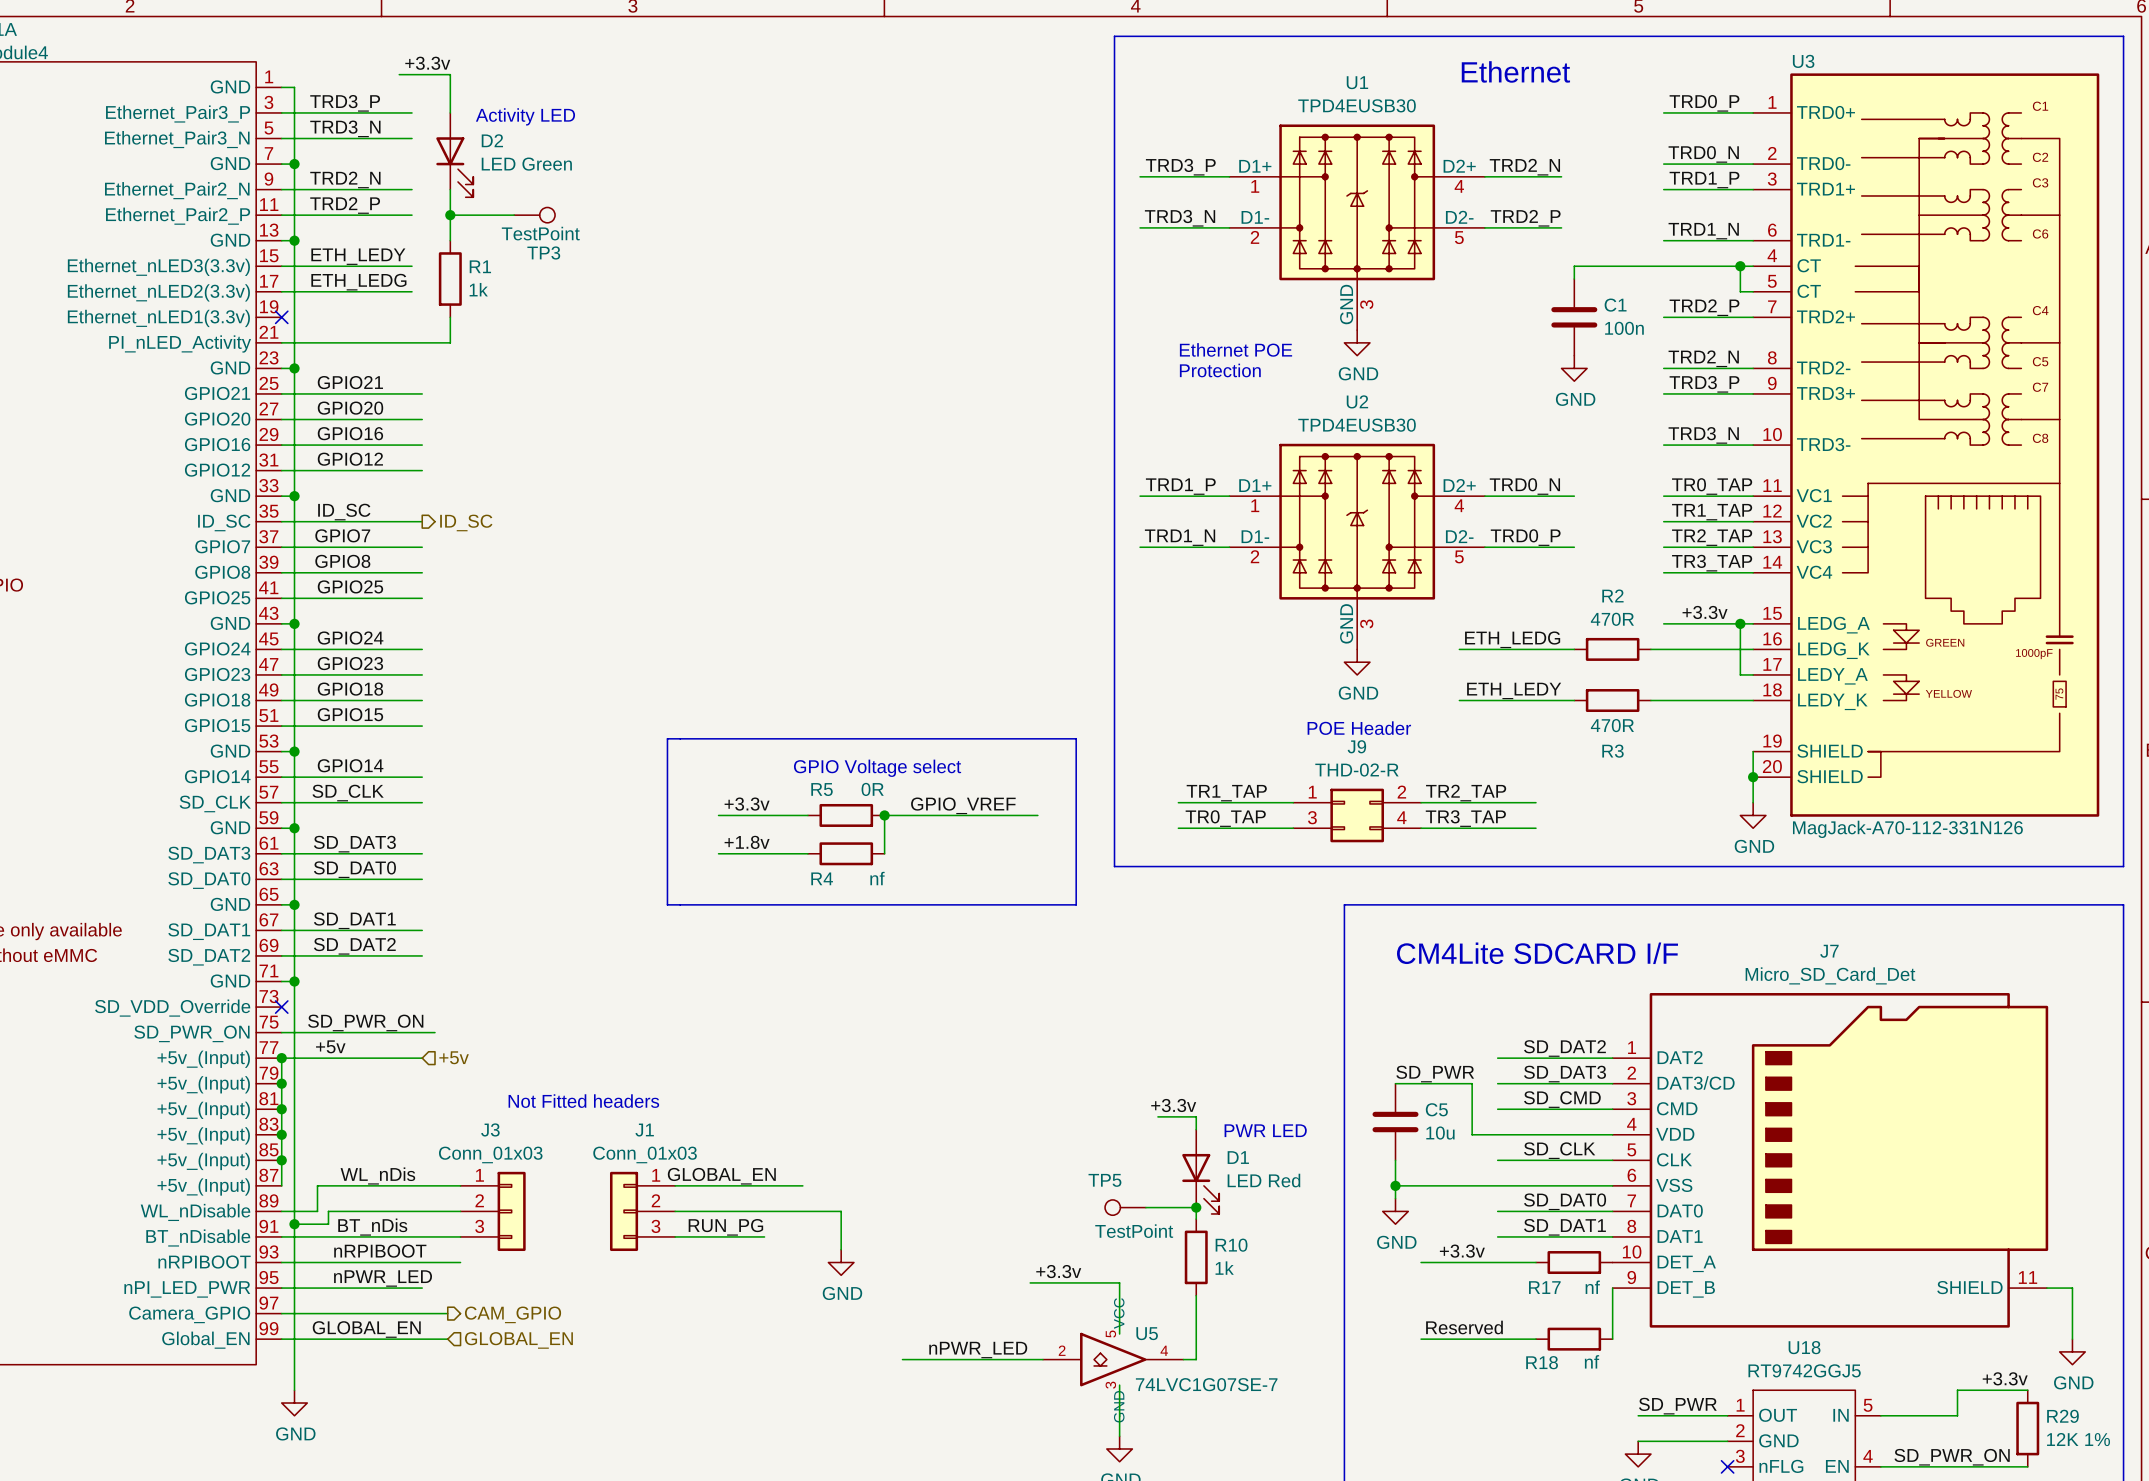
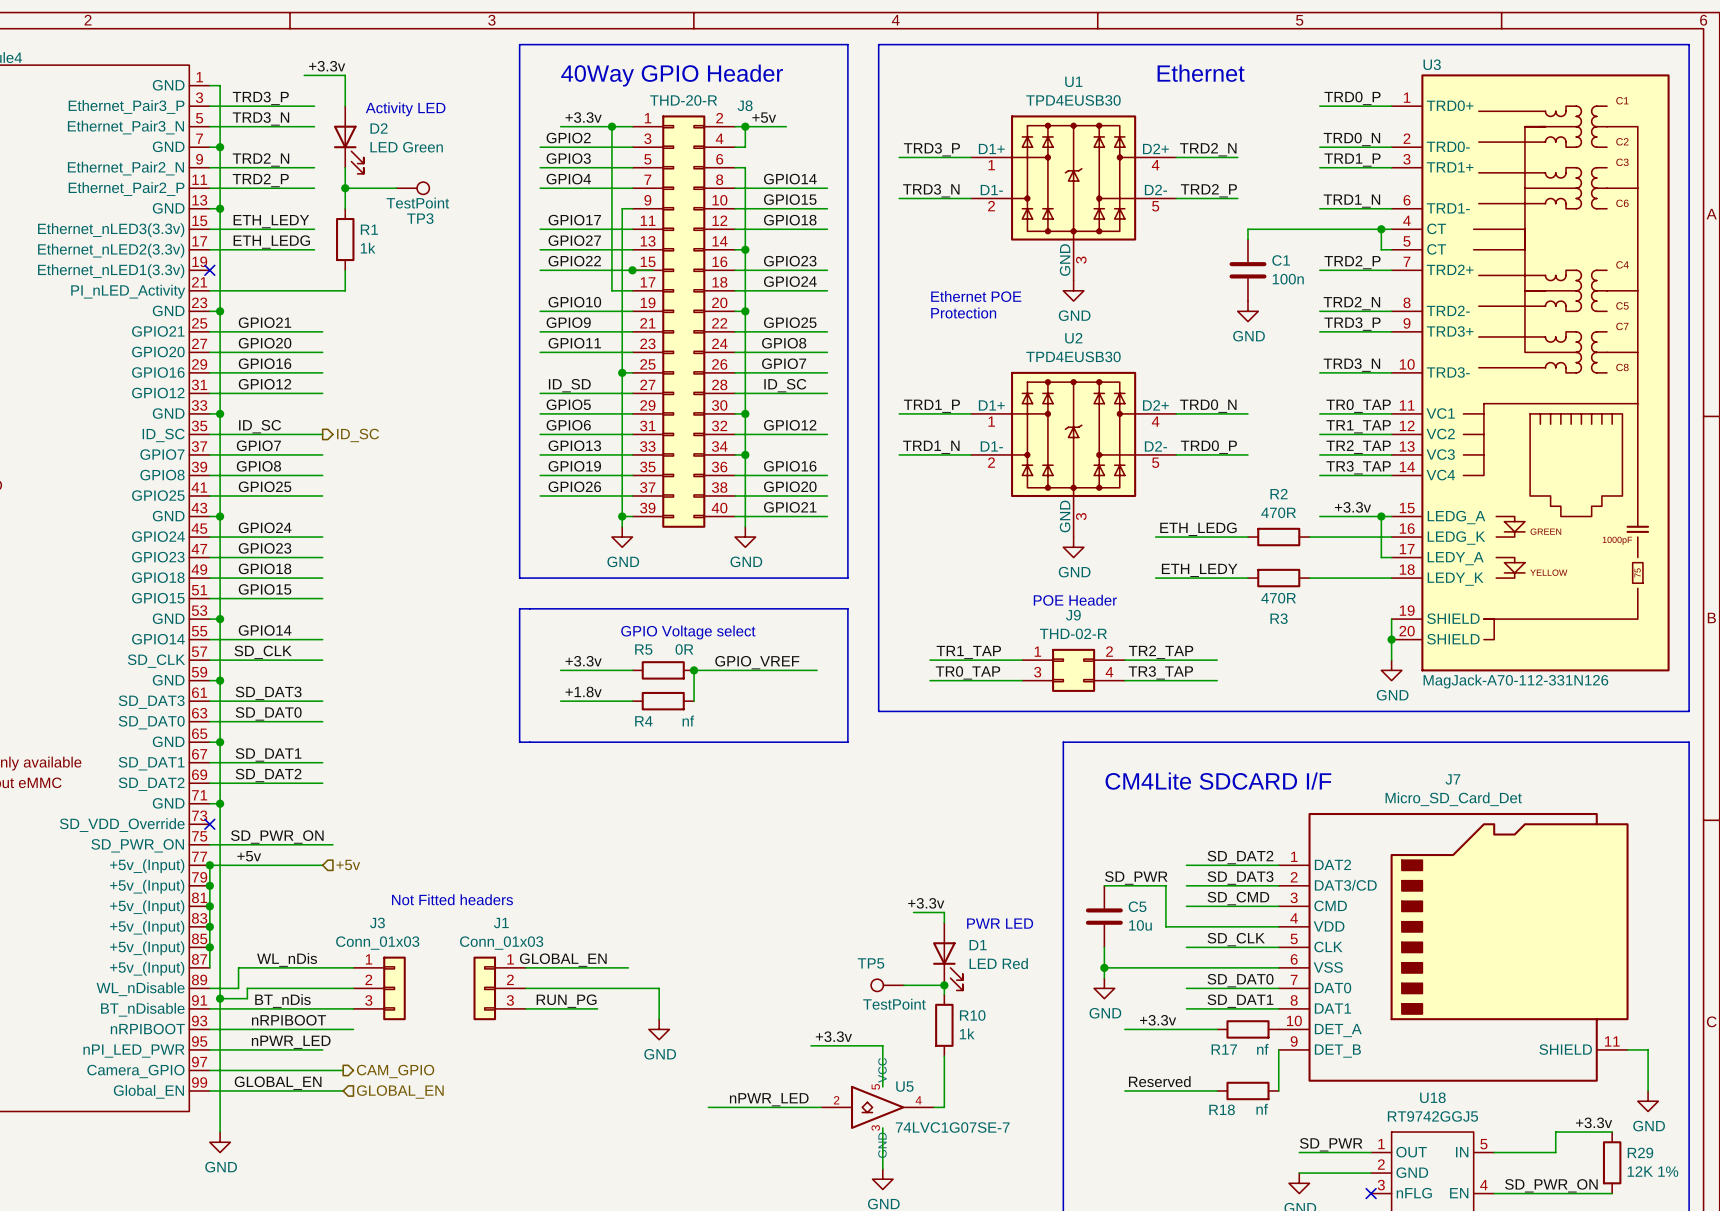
line: none -> (519, 44) (847, 44) (847, 578) (519, 578) (519, 44)
text: none -> 40Way GPIO Header (672, 75)
label: none -> +3.3v (583, 117)
label: none -> +5v (764, 117)
wire: none -> (560, 126) (632, 126)
wire: none -> (611, 126) (611, 290) (632, 290)
junction: none -> (611, 126)
wire: none -> (735, 126) (786, 126)
wire: none -> (745, 126) (745, 147) (735, 147)
junction: none -> (745, 126)
label: none -> GPIO2 (568, 138)
wire: none -> (540, 147) (632, 147)
label: none -> GPIO3 (568, 158)
wire: none -> (540, 167) (632, 167)
wire: none -> (735, 167) (745, 167) (745, 526)
label: none -> GPIO4 (568, 179)
label: none -> GPIO14 (790, 179)
wire: none -> (540, 188) (632, 188)
wire: none -> (735, 188) (827, 188)
label: none -> GPIO15 (790, 199)
wire: none -> (632, 208) (622, 208) (622, 526)
wire: none -> (735, 208) (827, 208)
label: none -> GPIO17 (574, 220)
label: none -> GPIO18 (790, 220)
wire: none -> (540, 229) (632, 229)
wire: none -> (735, 229) (827, 229)
label: none -> GPIO27 (574, 240)
wire: none -> (540, 249) (632, 249)
wire: none -> (735, 249) (745, 249)
junction: none -> (745, 249)
label: none -> GPIO22 (574, 261)
label: none -> GPIO23 (790, 261)
wire: none -> (540, 270) (653, 270)
junction: none -> (632, 270)
wire: none -> (735, 270) (827, 270)
label: none -> GPIO24 (790, 281)
wire: none -> (735, 290) (827, 290)
label: none -> GPIO10 (574, 302)
wire: none -> (540, 311) (632, 311)
wire: none -> (735, 311) (745, 311)
junction: none -> (745, 311)
J8: none -> THD-20-R (683, 321)
label: none -> GPIO9 (568, 322)
label: none -> GPIO25 (790, 322)
wire: none -> (540, 331) (632, 331)
wire: none -> (735, 331) (827, 331)
label: none -> GPIO11 (574, 343)
label: none -> GPIO8 (784, 343)
wire: none -> (540, 352) (632, 352)
wire: none -> (735, 352) (827, 352)
label: none -> GPIO7 (784, 363)
wire: none -> (622, 372) (632, 372)
junction: none -> (622, 372)
wire: none -> (735, 372) (827, 372)
label: none -> ID_SD (569, 385)
label: none -> ID_SC (785, 385)
wire: none -> (540, 393) (632, 393)
wire: none -> (735, 393) (827, 393)
label: none -> GPIO5 (568, 404)
wire: none -> (540, 413) (632, 413)
wire: none -> (735, 413) (745, 413)
junction: none -> (745, 413)
label: none -> GPIO6 (568, 425)
label: none -> GPIO12 (790, 425)
wire: none -> (540, 434) (632, 434)
wire: none -> (735, 434) (827, 434)
label: none -> GPIO13 (574, 445)
wire: none -> (540, 454) (632, 454)
wire: none -> (735, 454) (745, 454)
junction: none -> (745, 454)
label: none -> GPIO19 (574, 466)
label: none -> GPIO16 (790, 466)
wire: none -> (540, 475) (632, 475)
wire: none -> (735, 475) (827, 475)
label: none -> GPIO26 (574, 486)
label: none -> GPIO20 (790, 486)
wire: none -> (540, 495) (632, 495)
wire: none -> (735, 495) (827, 495)
label: none -> GPIO21 (790, 507)
wire: none -> (622, 516) (632, 516)
junction: none -> (622, 516)
wire: none -> (735, 516) (827, 516)
power symbol: none -> GND (622, 537)
power symbol: none -> GND (745, 537)

